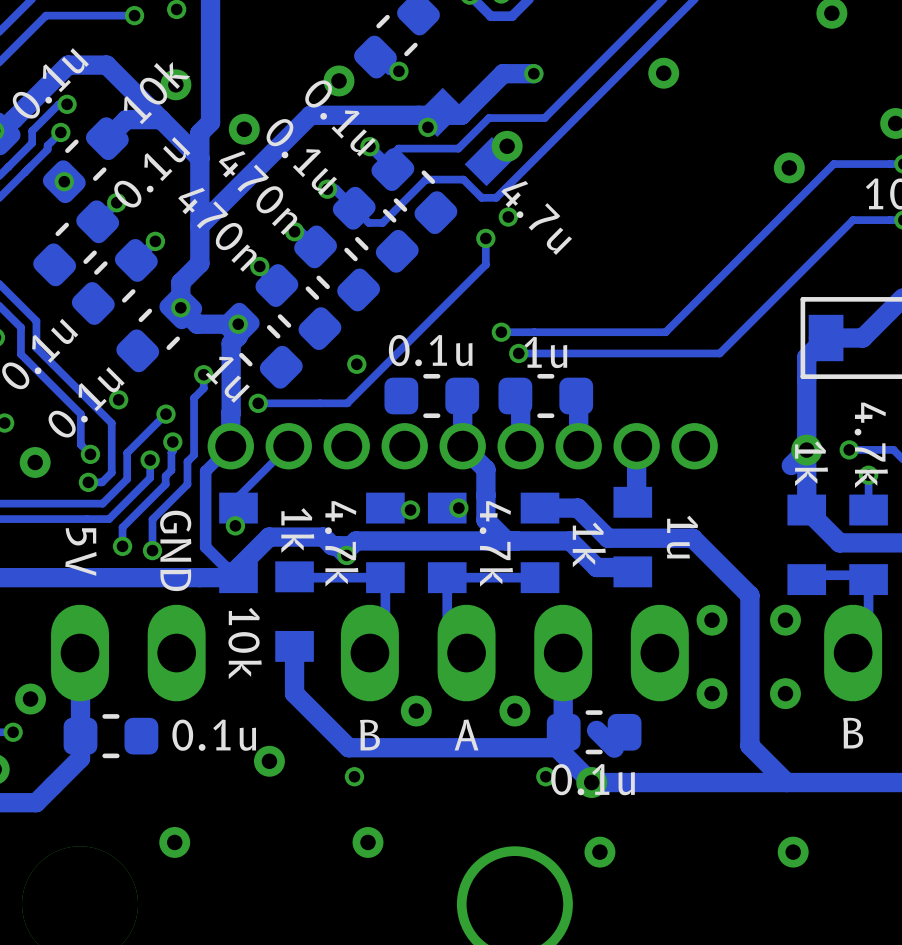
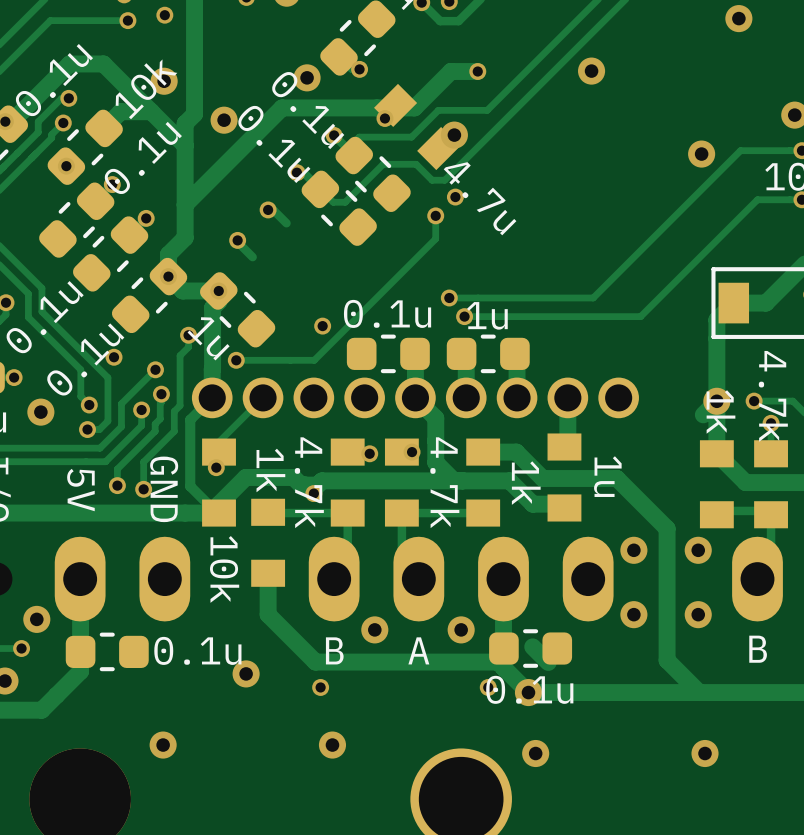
part: 470n (337, 268) -> none
part: 470n (298, 307) -> none

